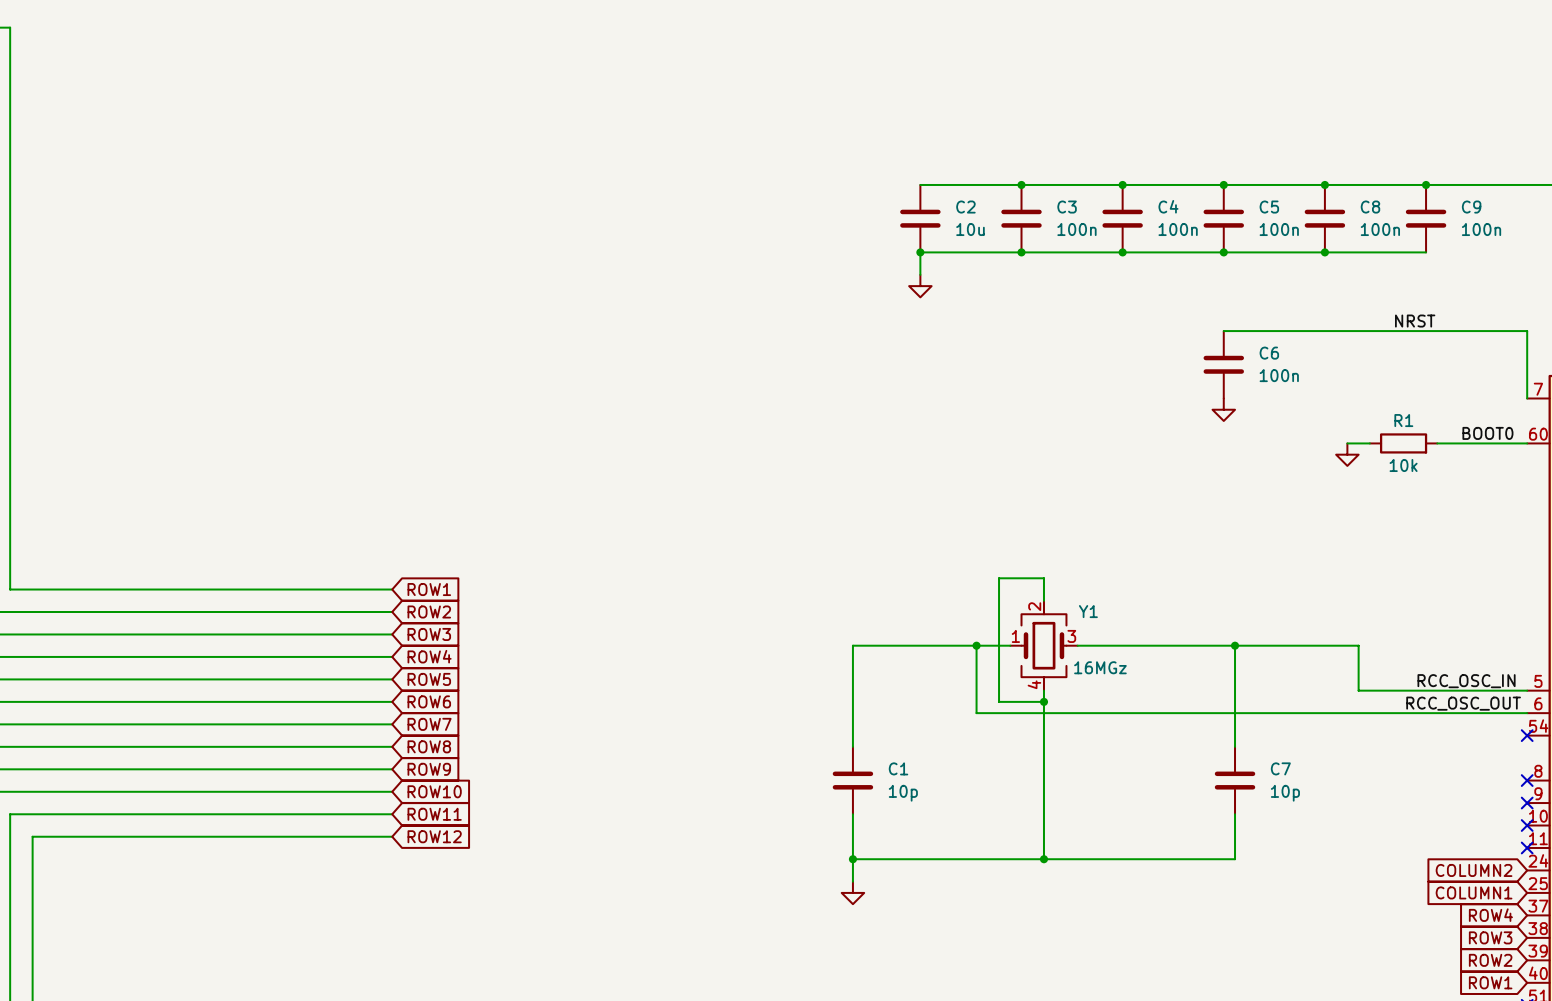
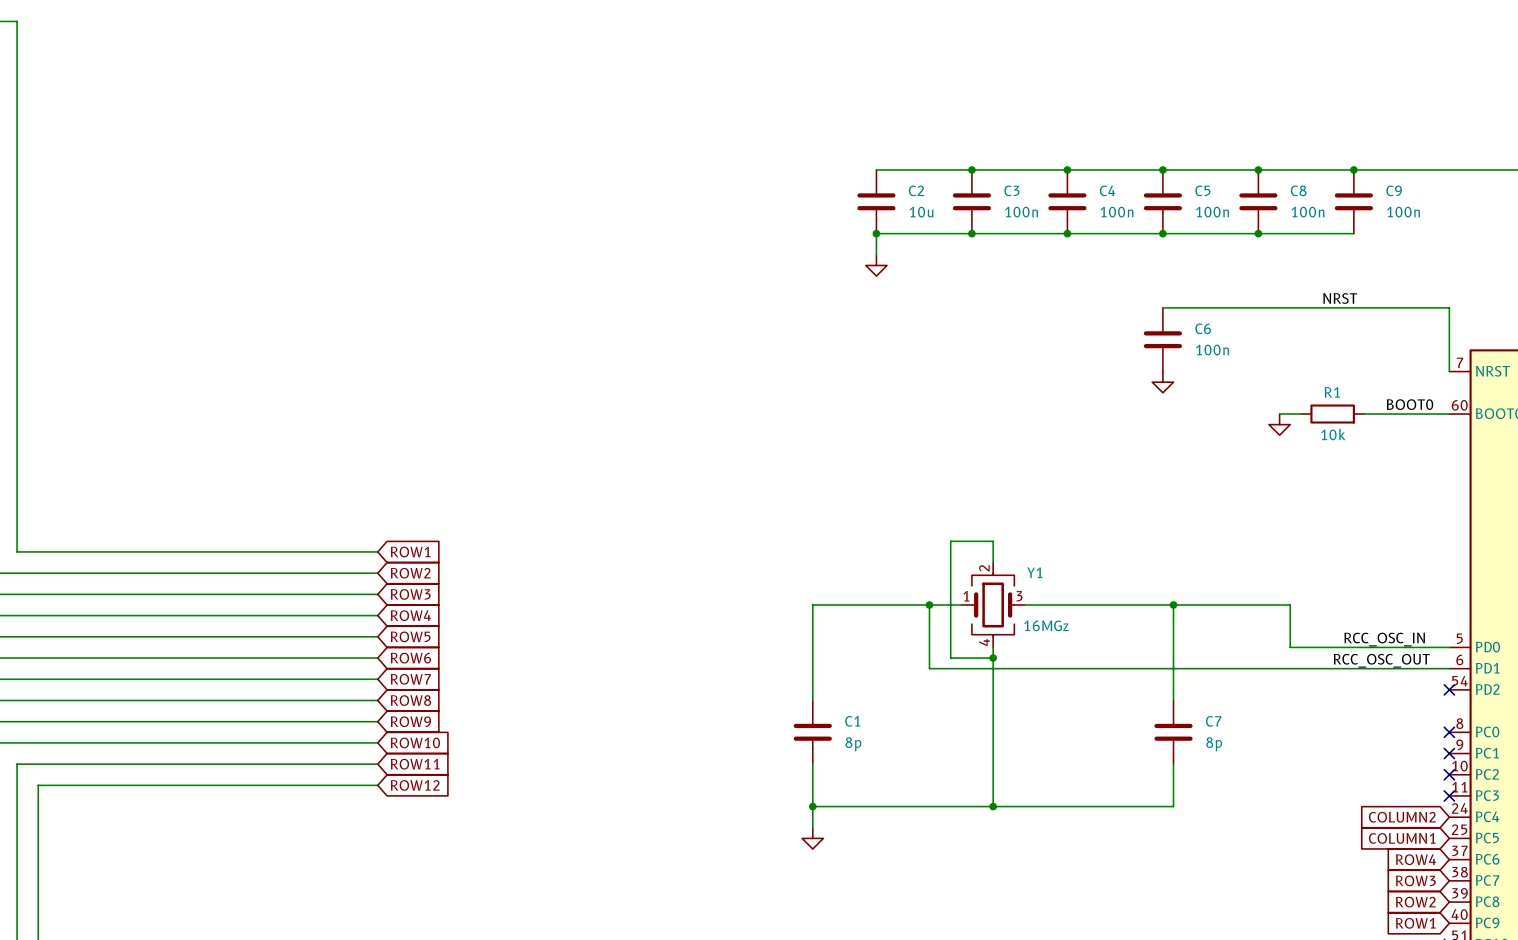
C1 value: 10p (903, 793) -> 8p (853, 744)
C7 value: 10p (1285, 793) -> 8p (1214, 744)

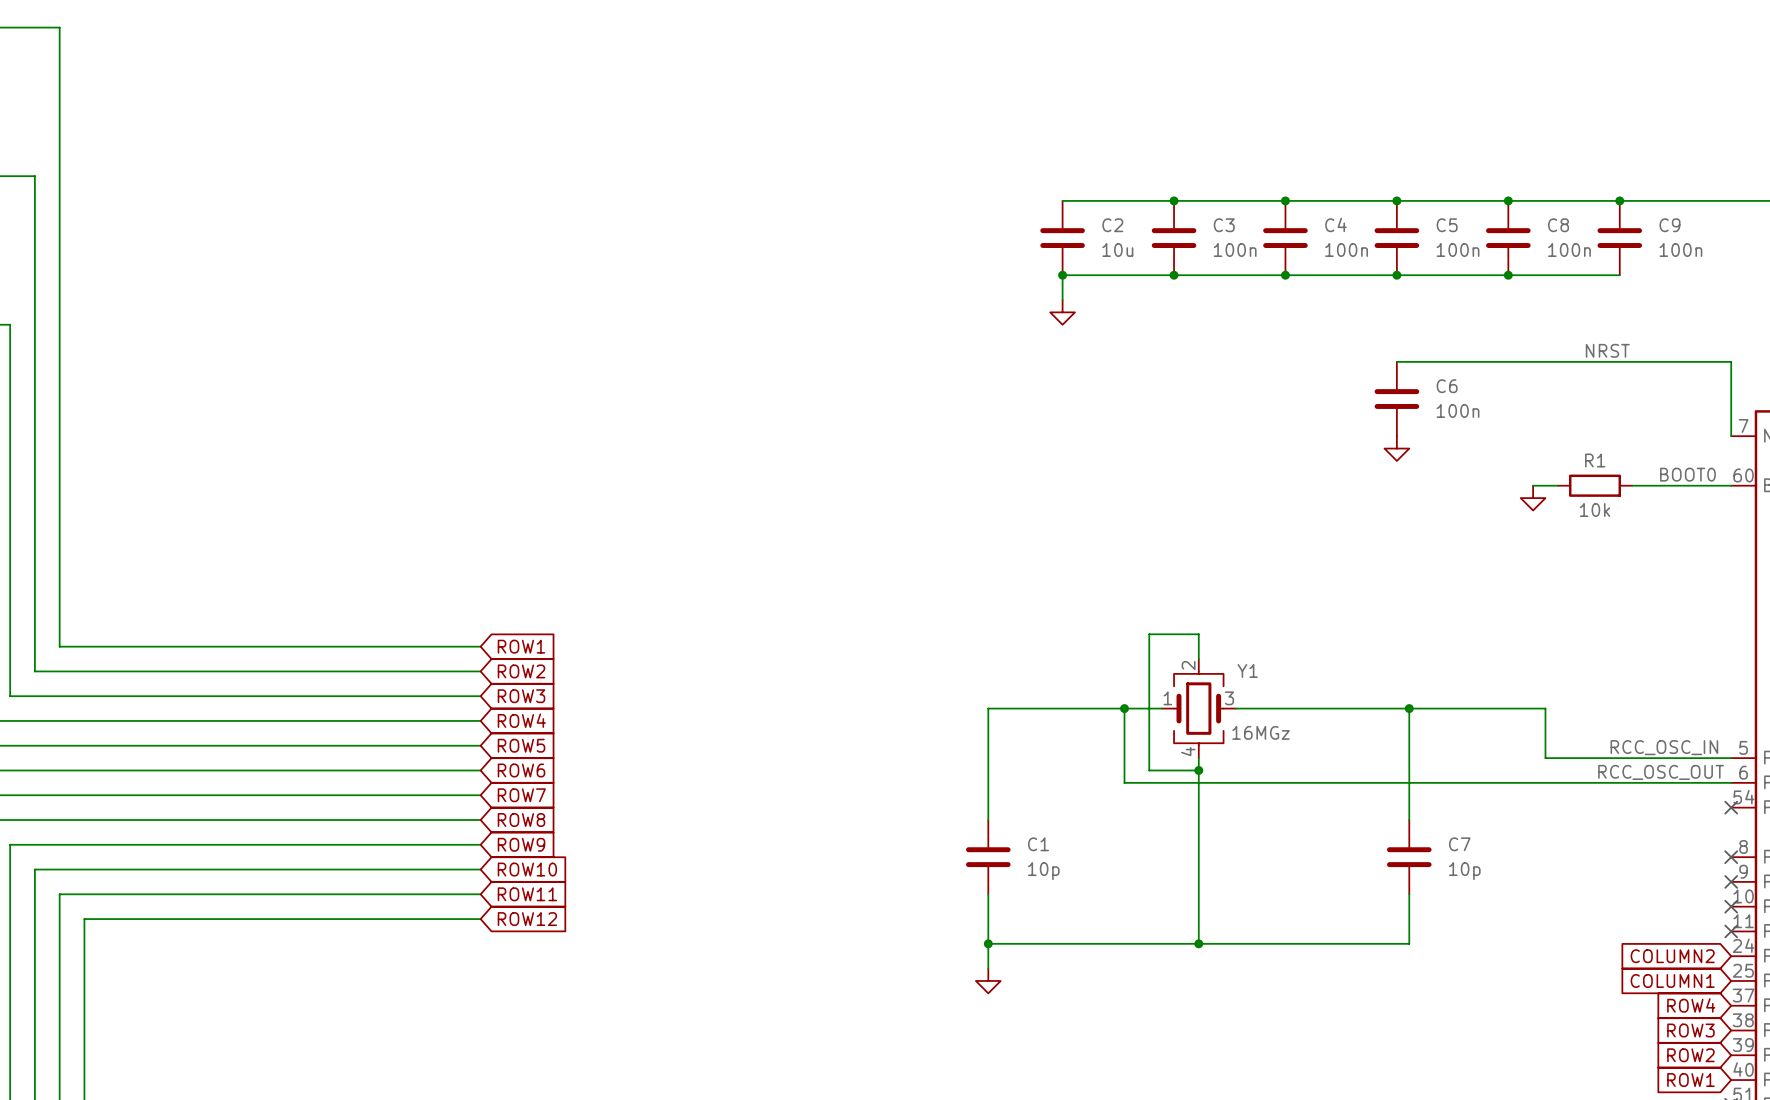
C1 value: 8p (853, 744) -> 10p (1043, 871)
C7 value: 8p (1214, 744) -> 10p (1464, 871)

